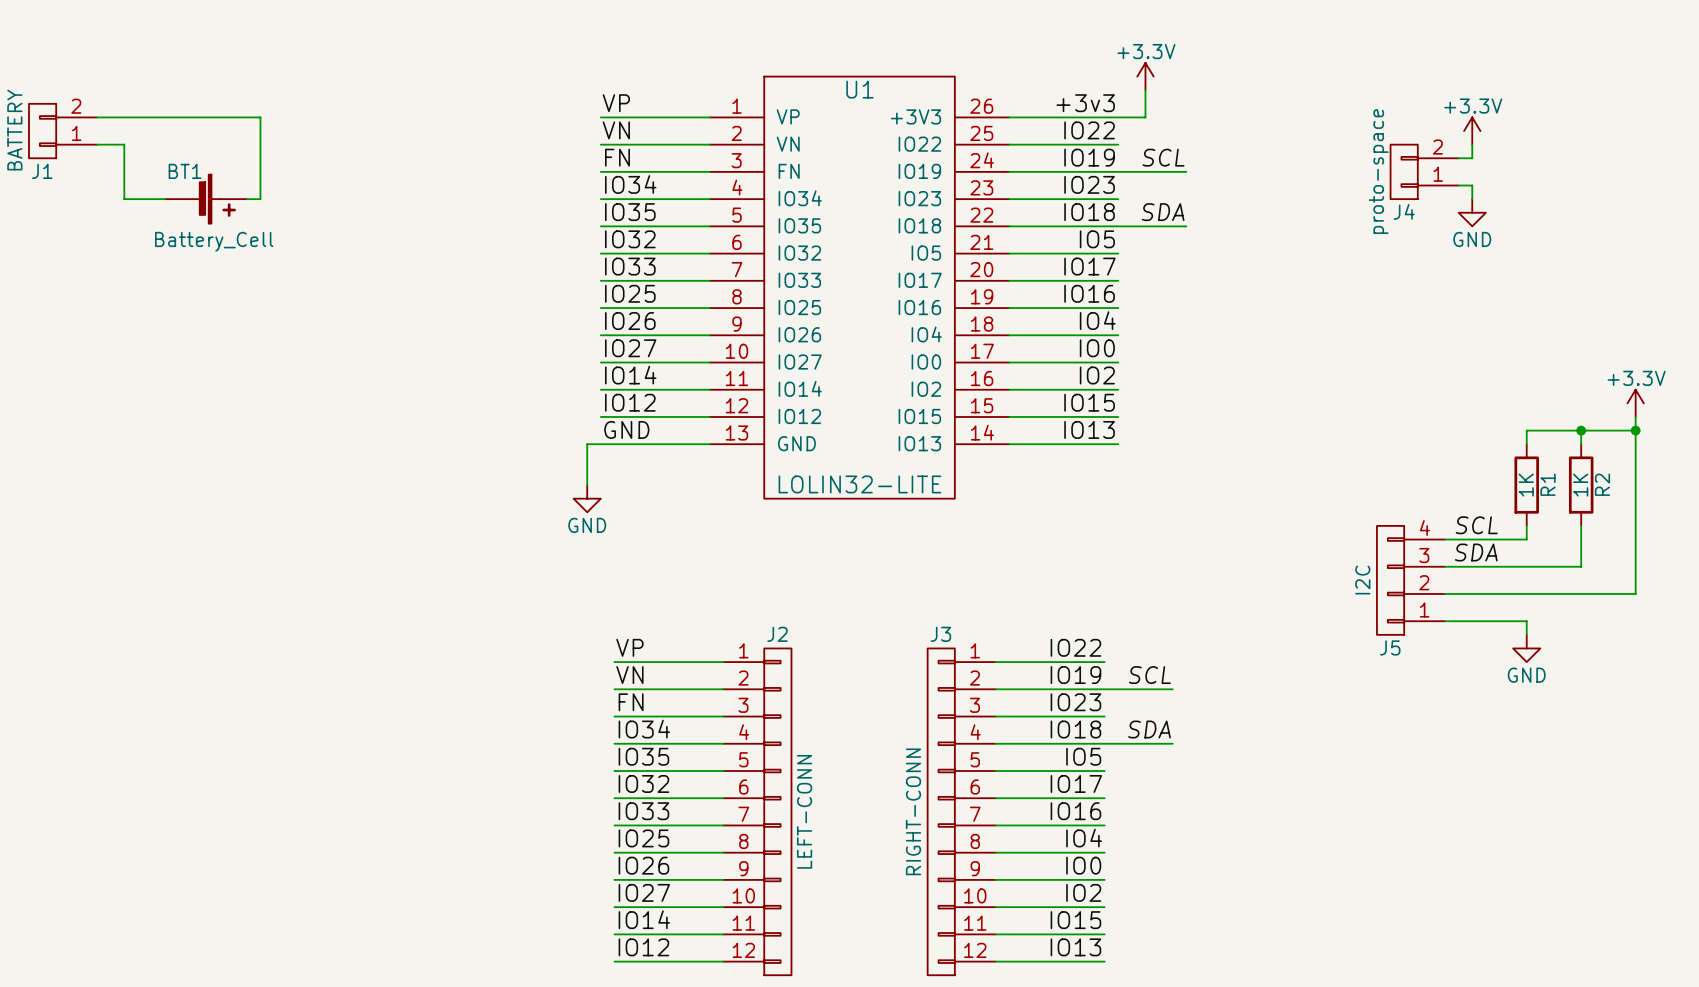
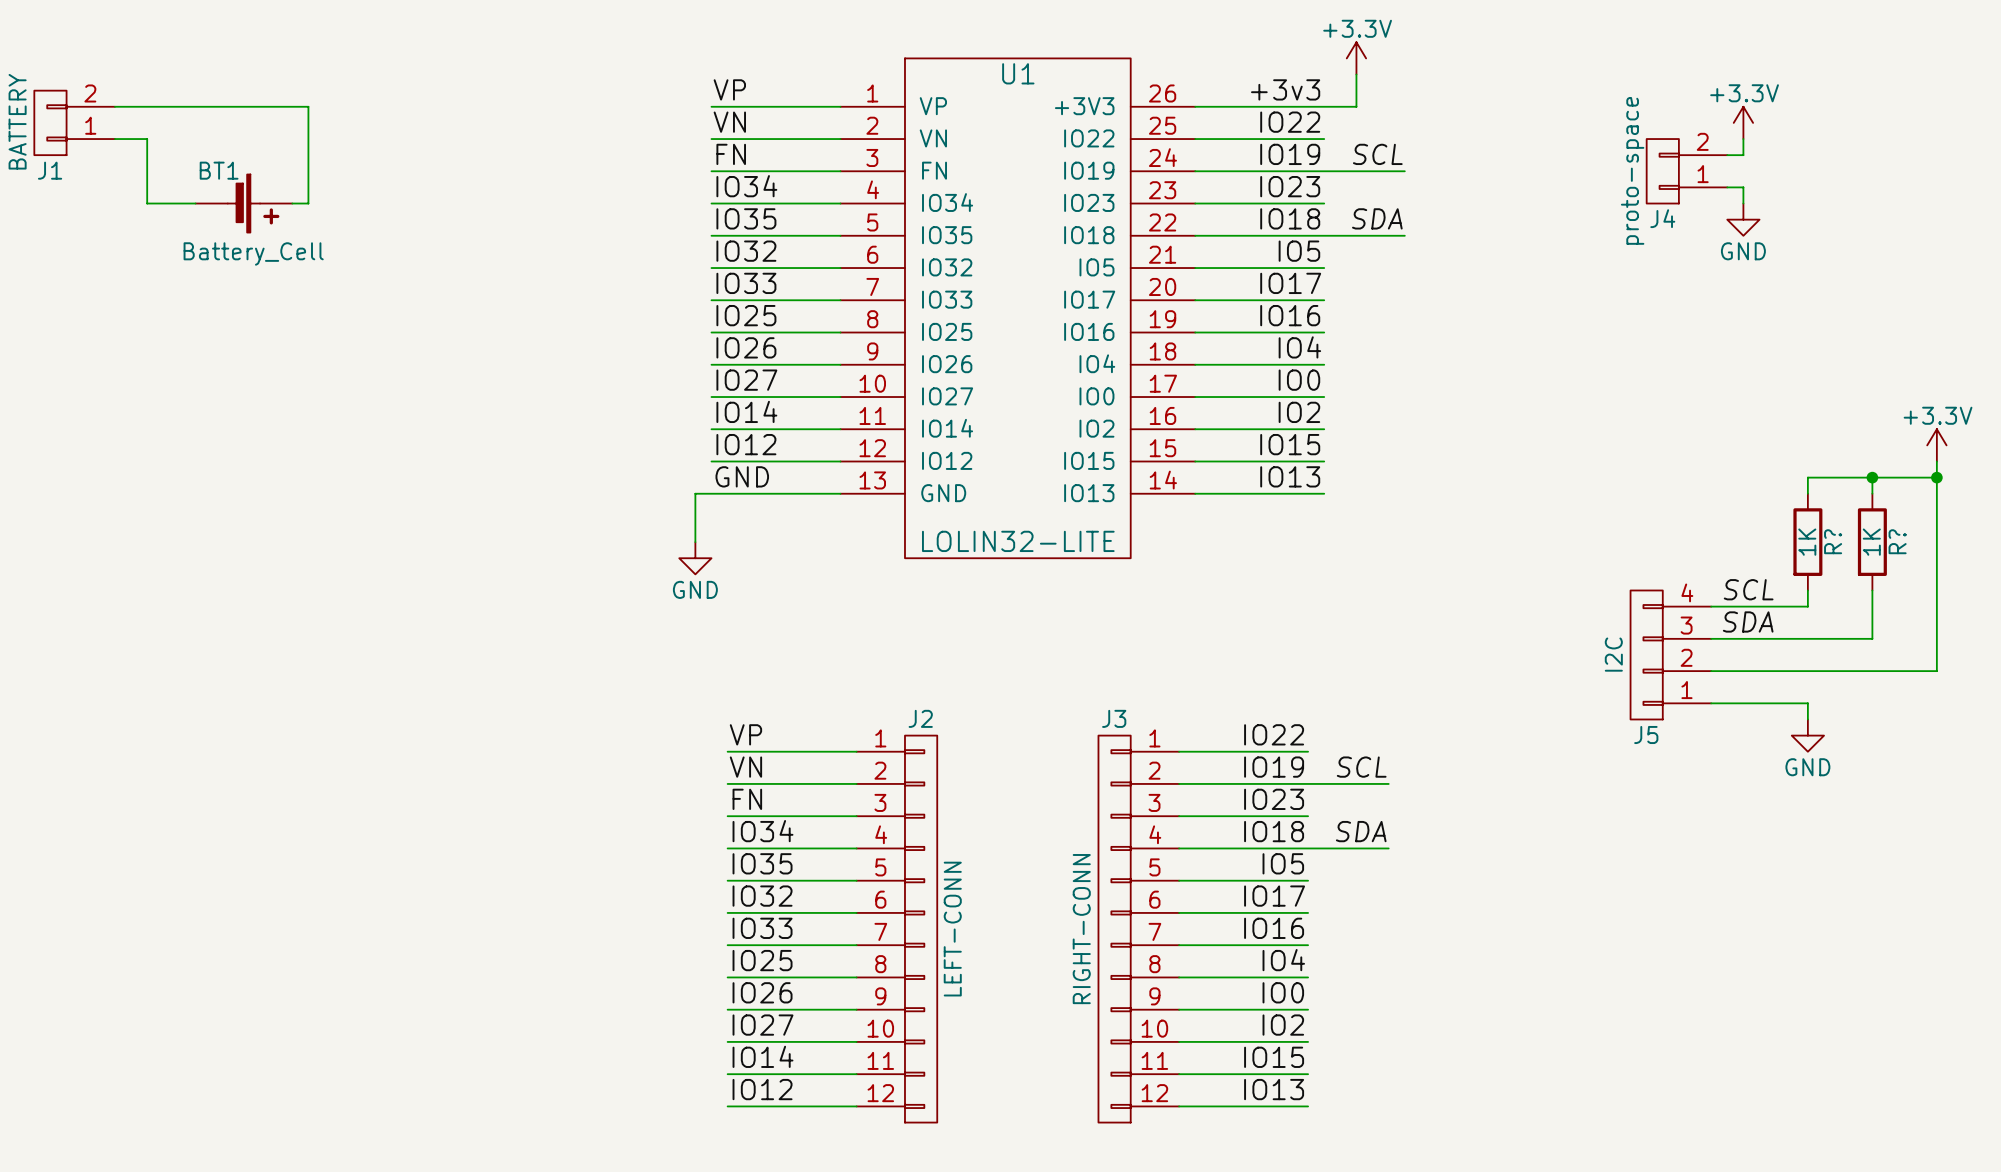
R1 name: R1 (1548, 484) -> R? (1833, 541)
R2 name: R2 (1602, 484) -> R? (1897, 541)

